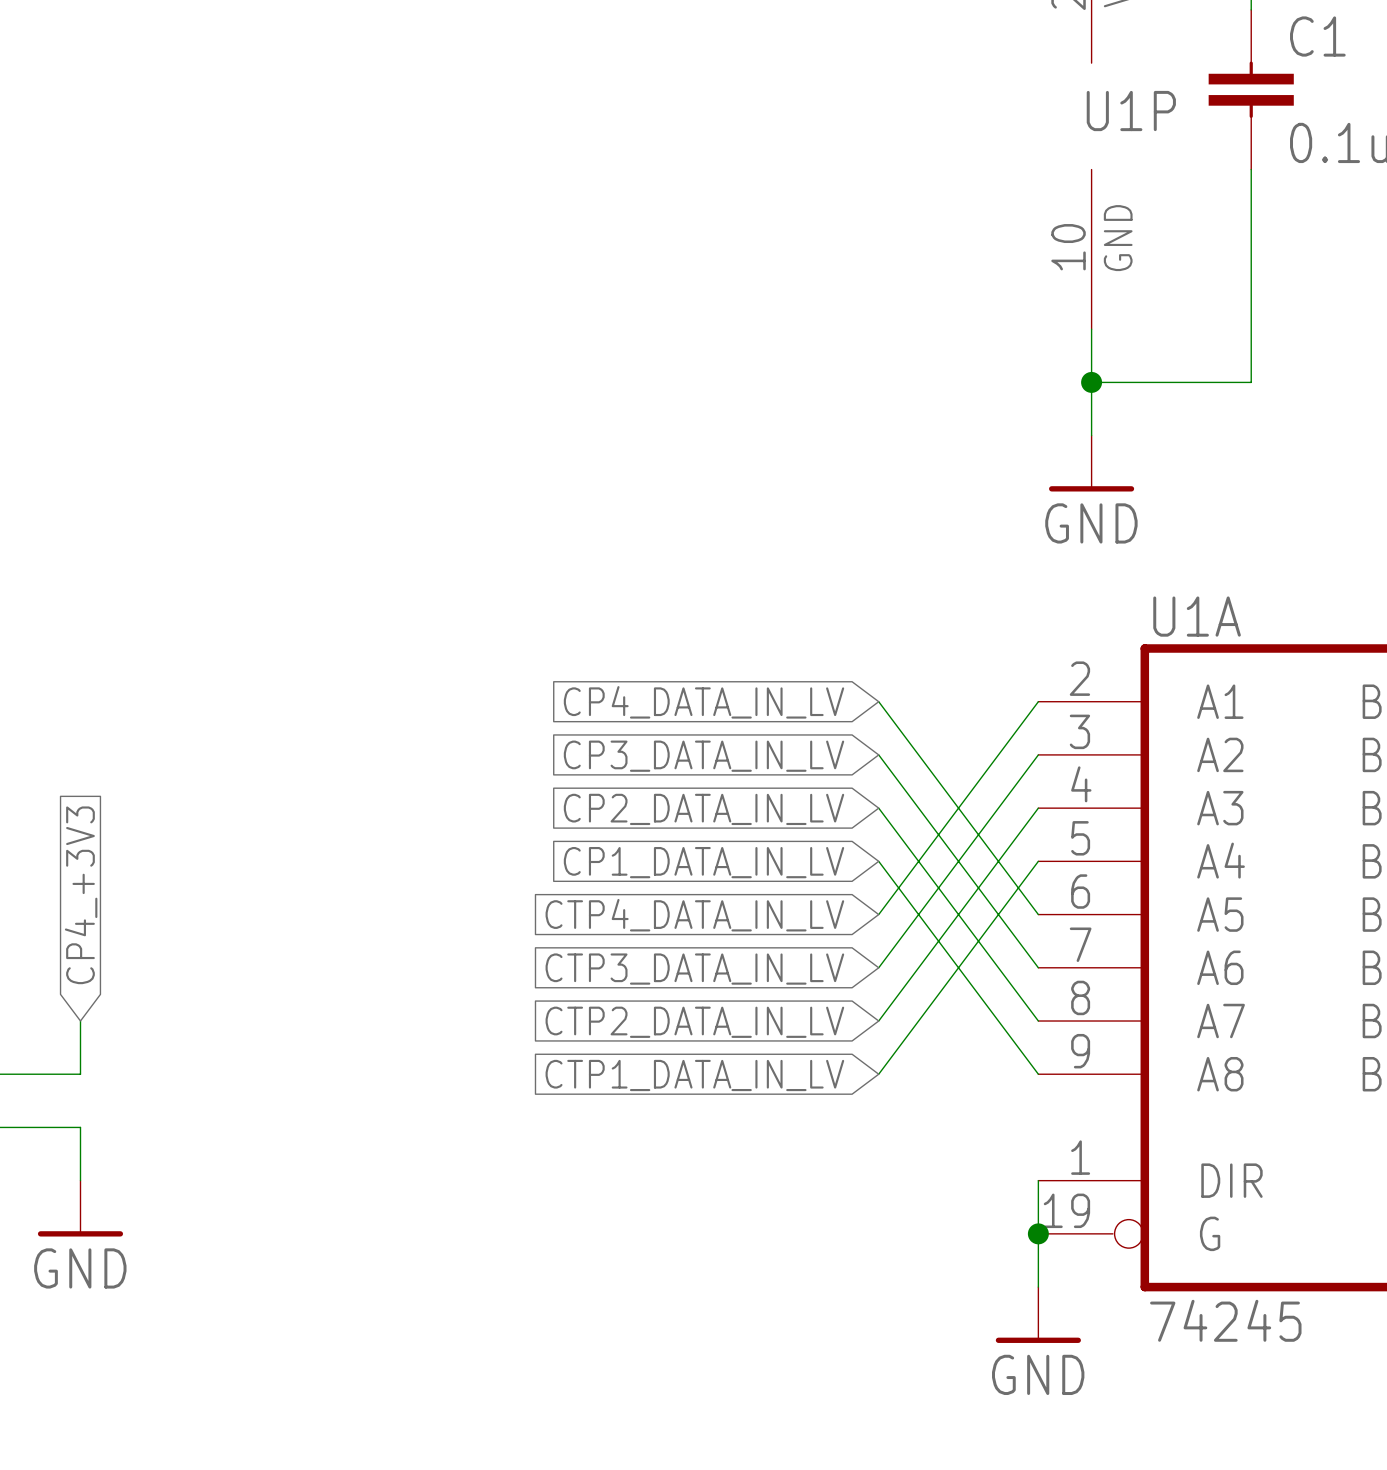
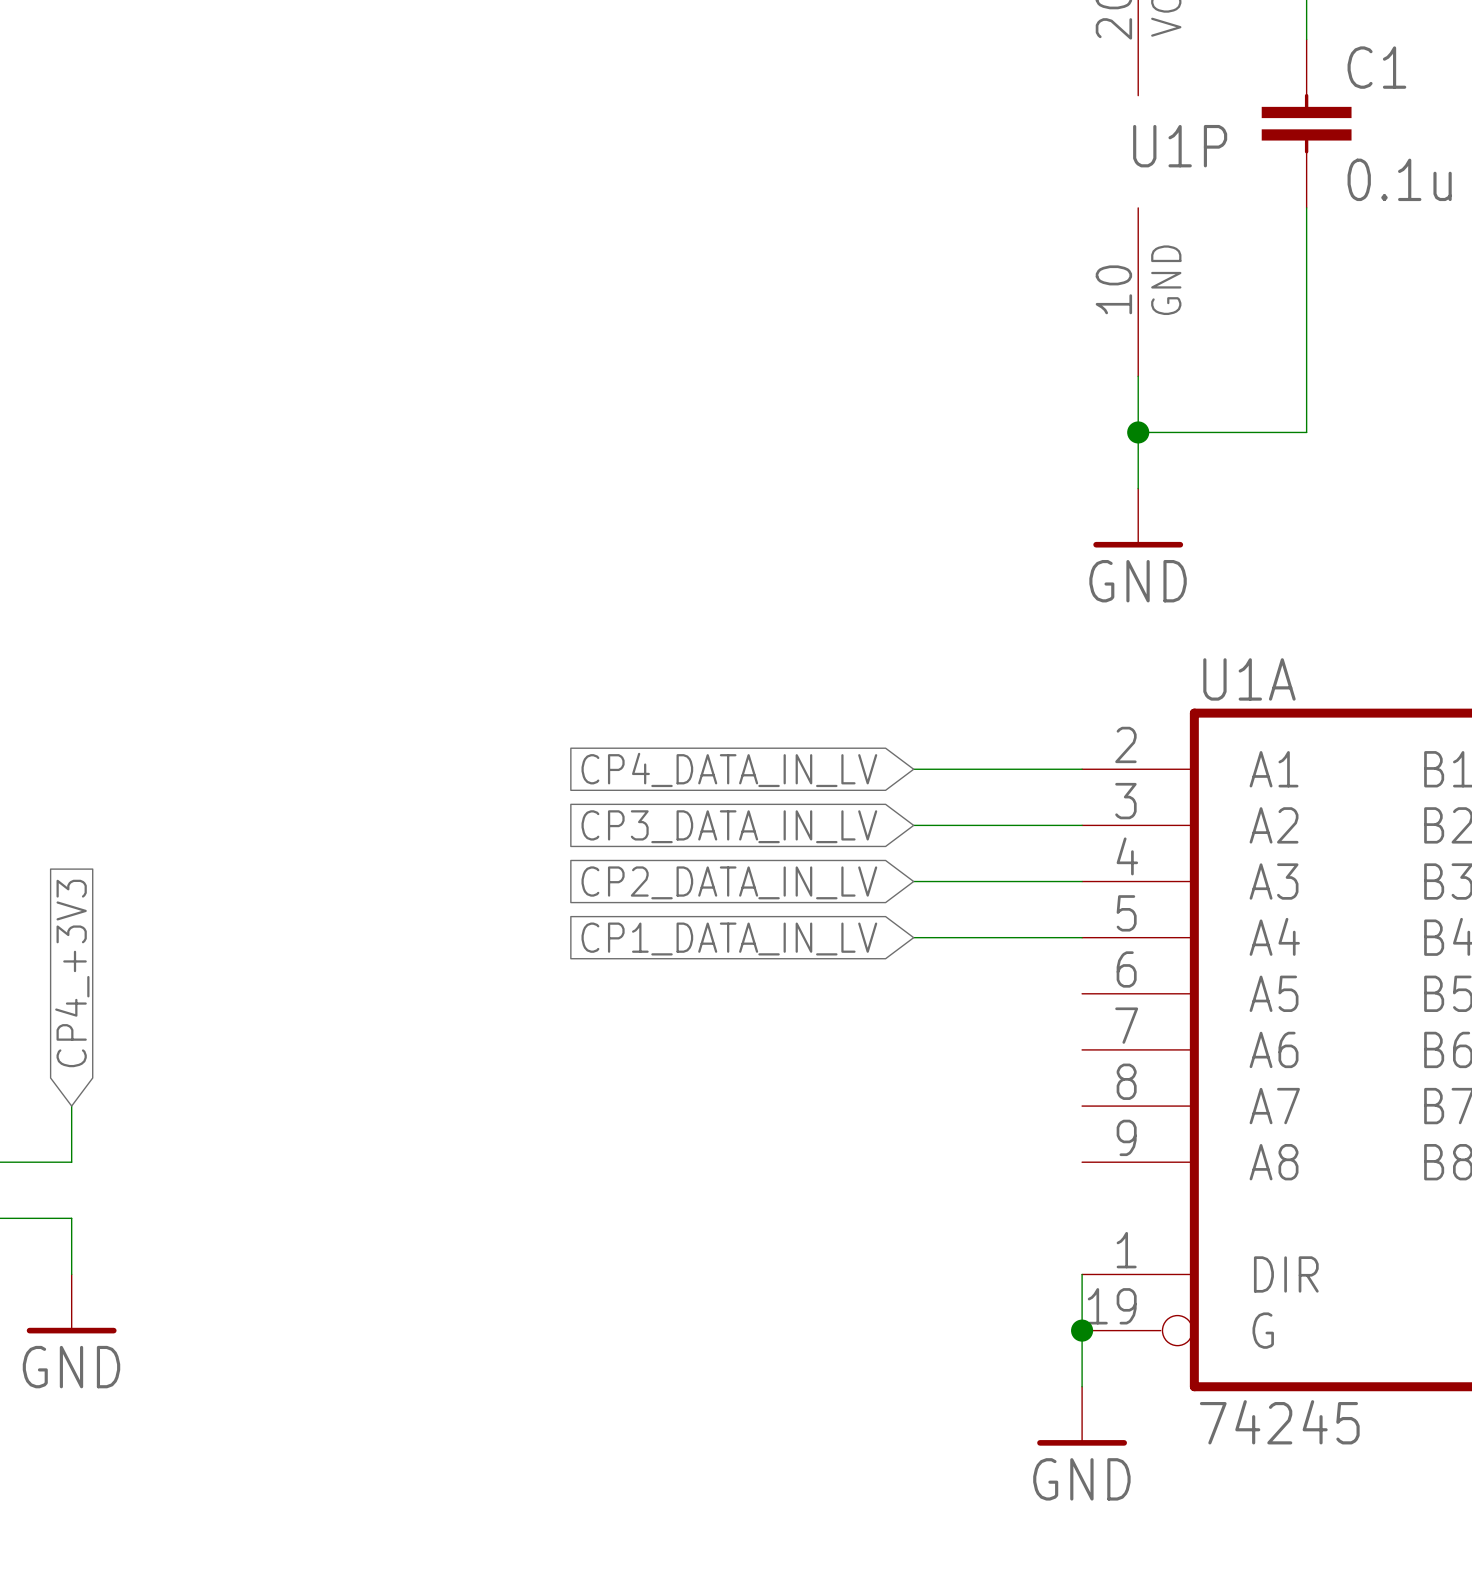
wire: (878, 701) (1038, 914) -> (913, 769) (1082, 769)
wire: (1038, 701) (878, 914) -> none
wire: (878, 754) (1038, 967) -> (913, 825) (1082, 825)
wire: (1038, 754) (878, 967) -> none
wire: (878, 808) (1038, 1021) -> (913, 881) (1082, 881)
wire: (1038, 808) (878, 1021) -> none
wire: (878, 861) (1038, 1074) -> (913, 937) (1082, 937)
wire: (1038, 861) (878, 1074) -> none
global label: CTP4_DATA_IN_LV (694, 915) -> none
global label: CTP3_DATA_IN_LV (694, 969) -> none
global label: CTP2_DATA_IN_LV (694, 1022) -> none
global label: CTP1_DATA_IN_LV (694, 1075) -> none

